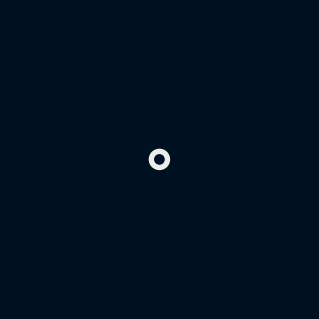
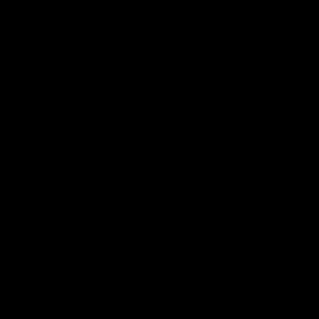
via: (159, 159) -> none

